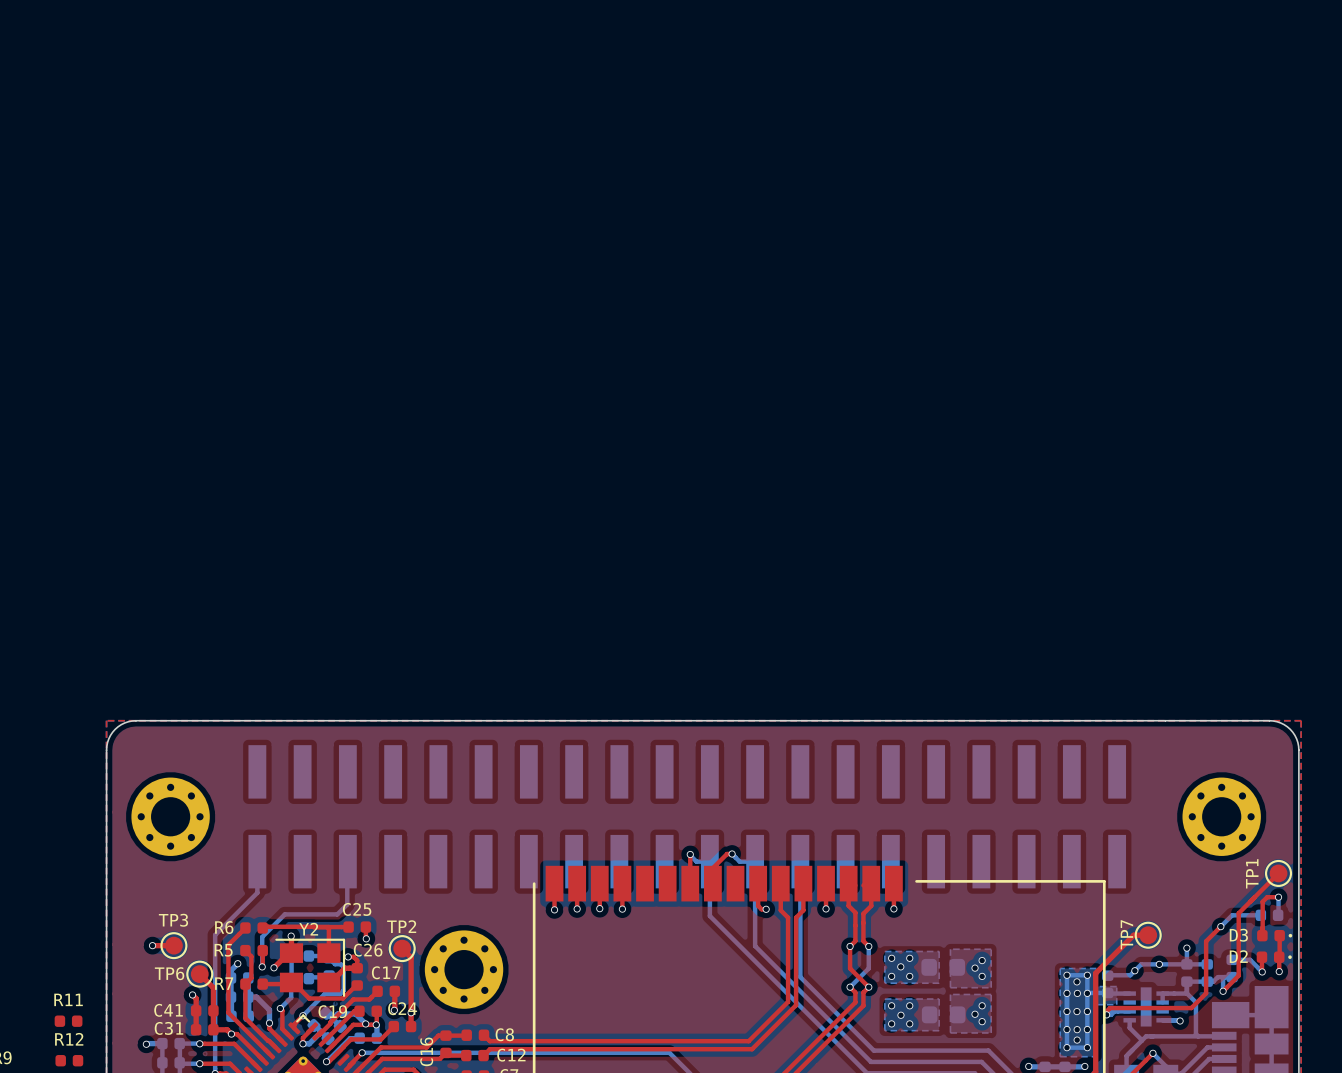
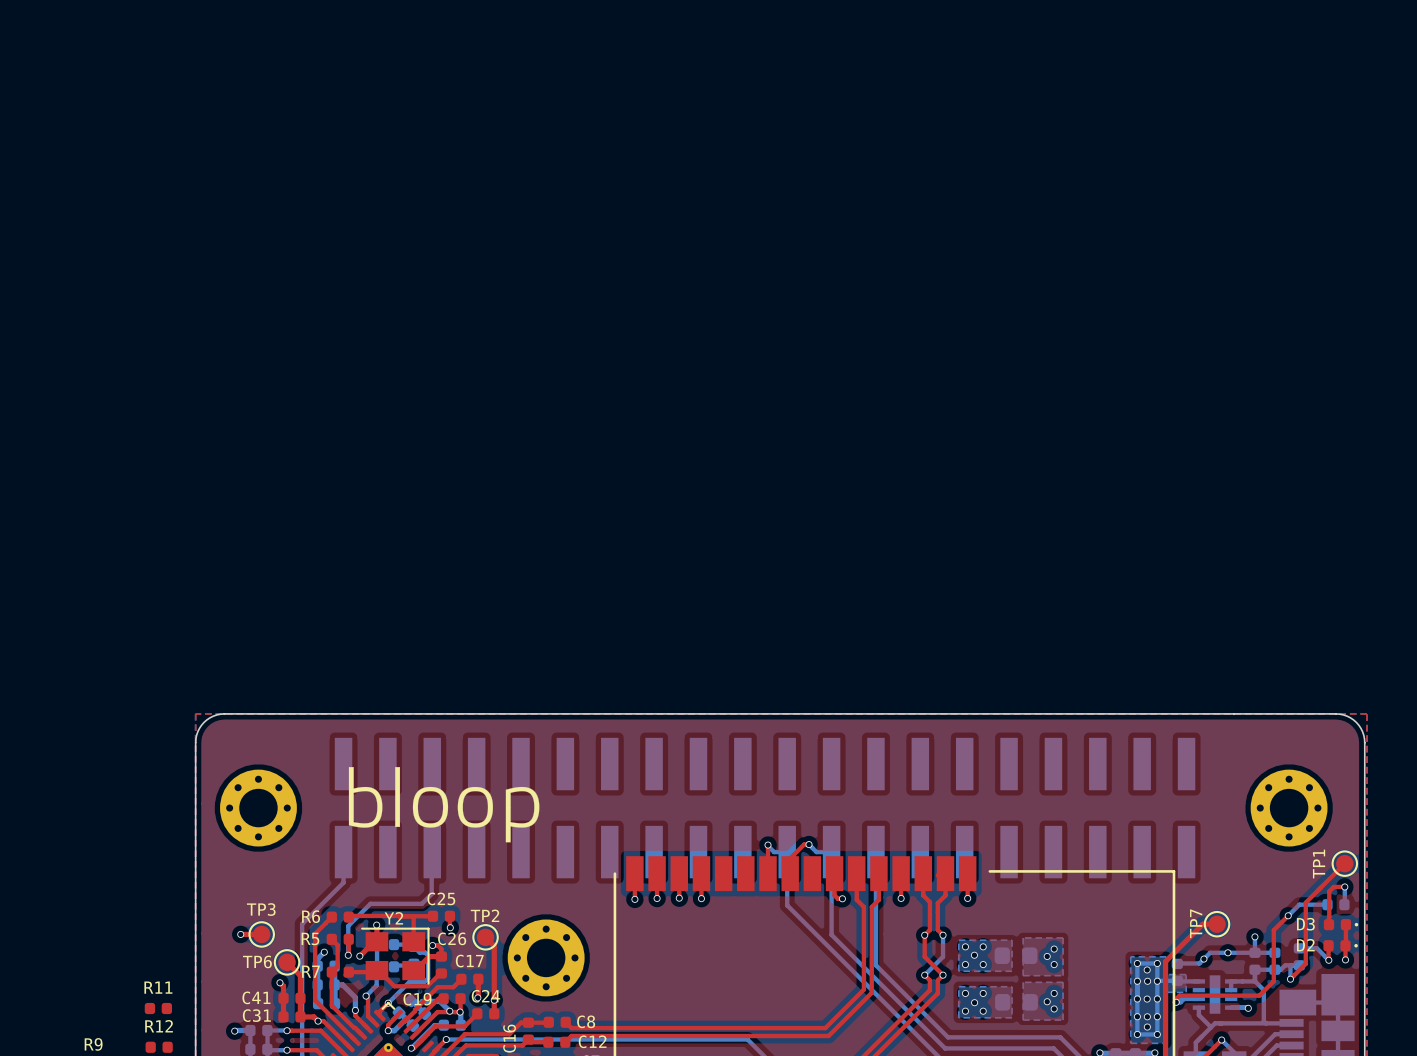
drawing: none -> [348, 767, 540, 843]

